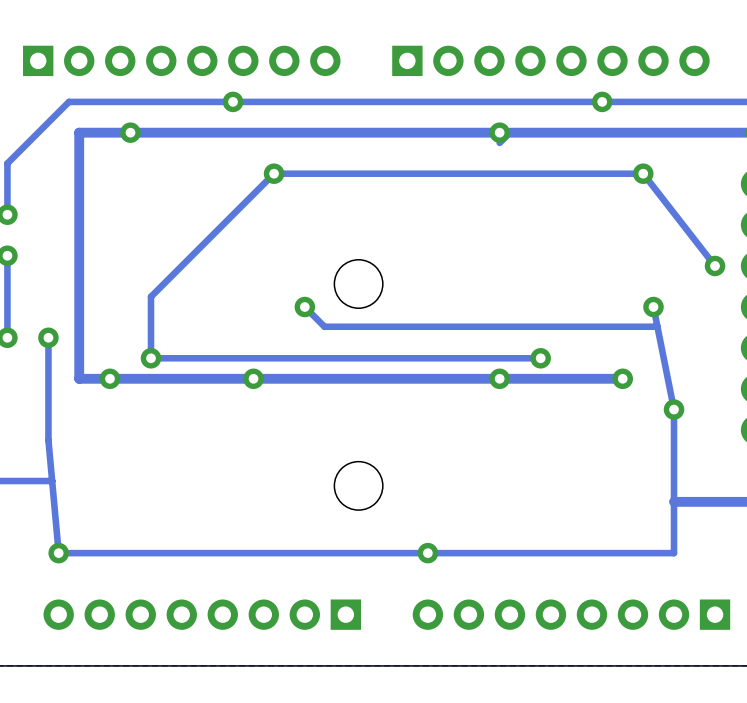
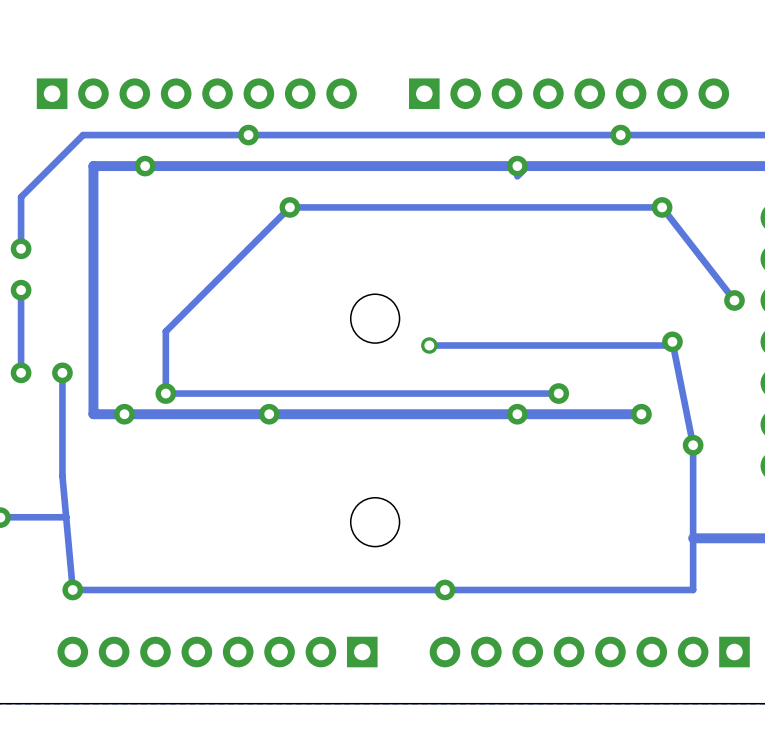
track: (304, 307) (324, 326) (657, 326) -> none
via: (304, 307) -> none
via: none -> (429, 345)
track: none -> (672, 345) (429, 345)

